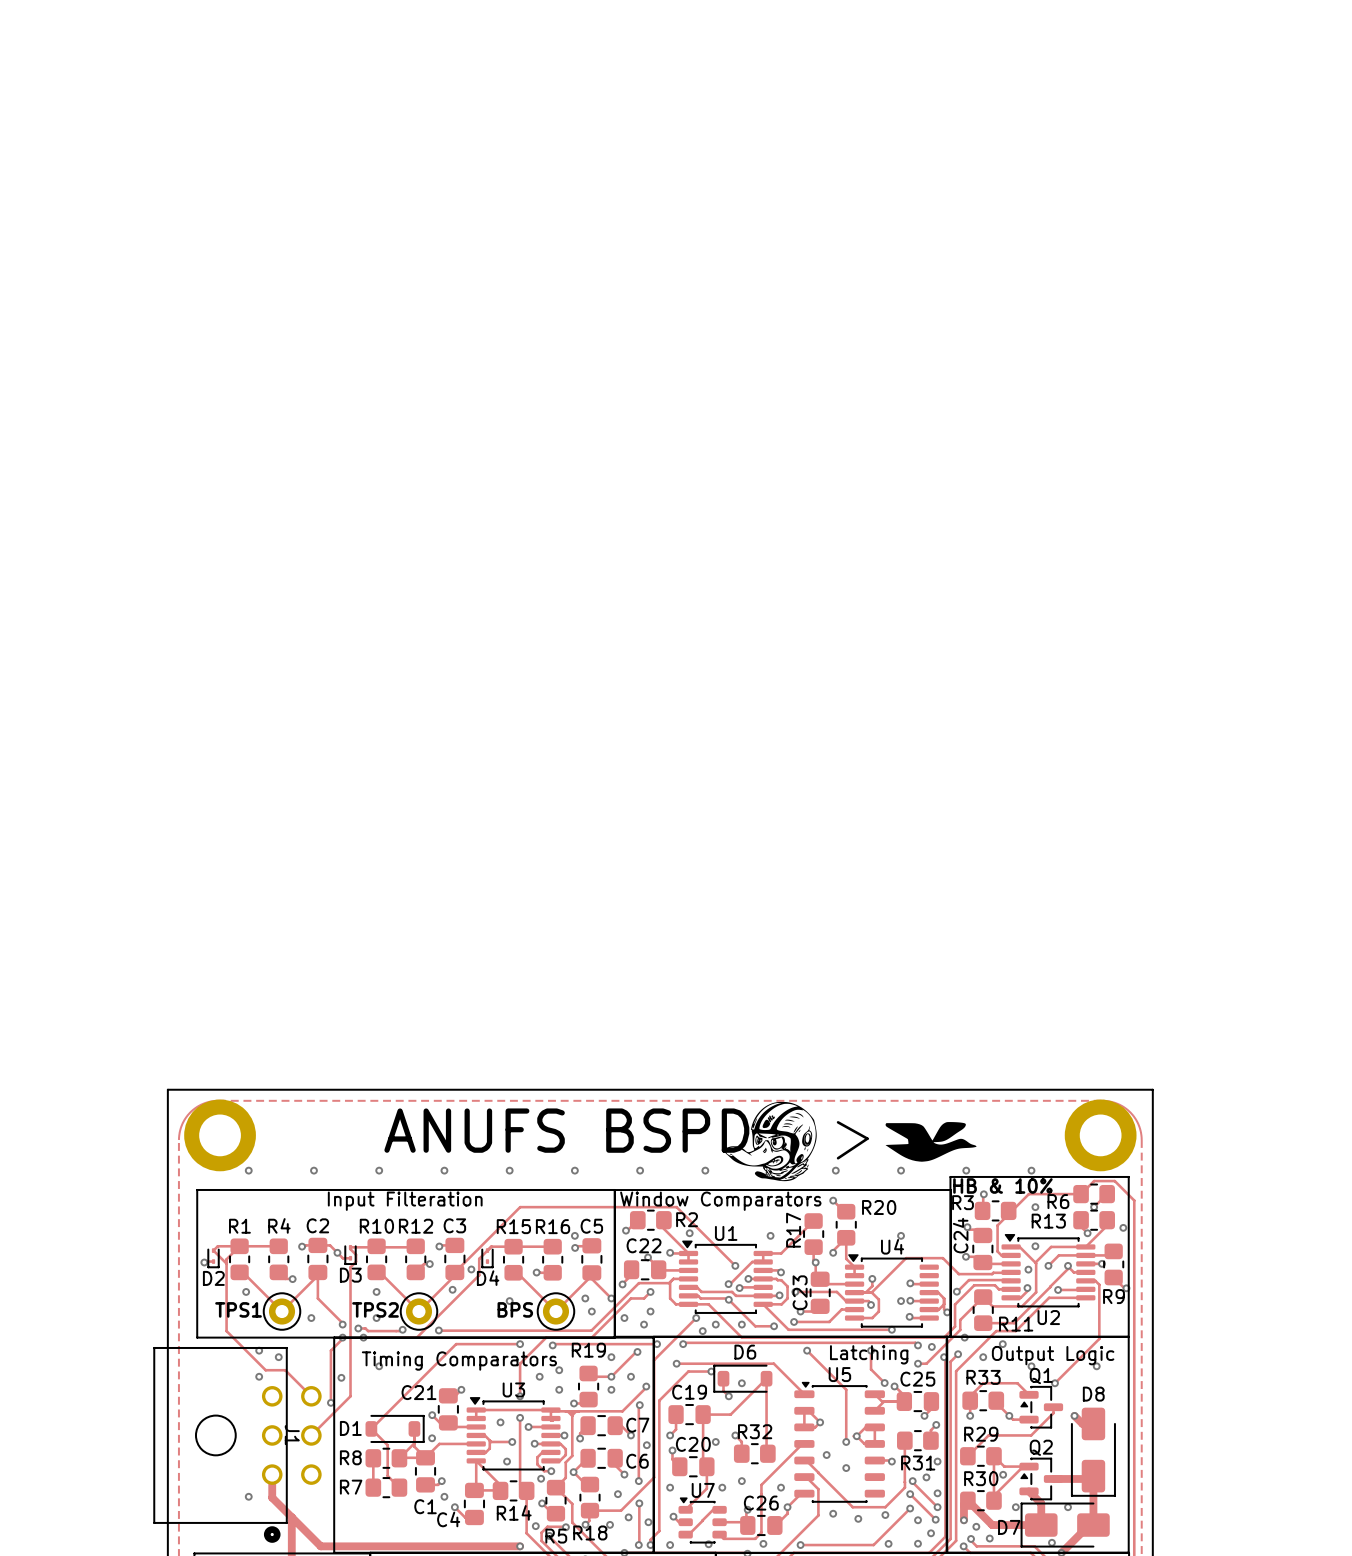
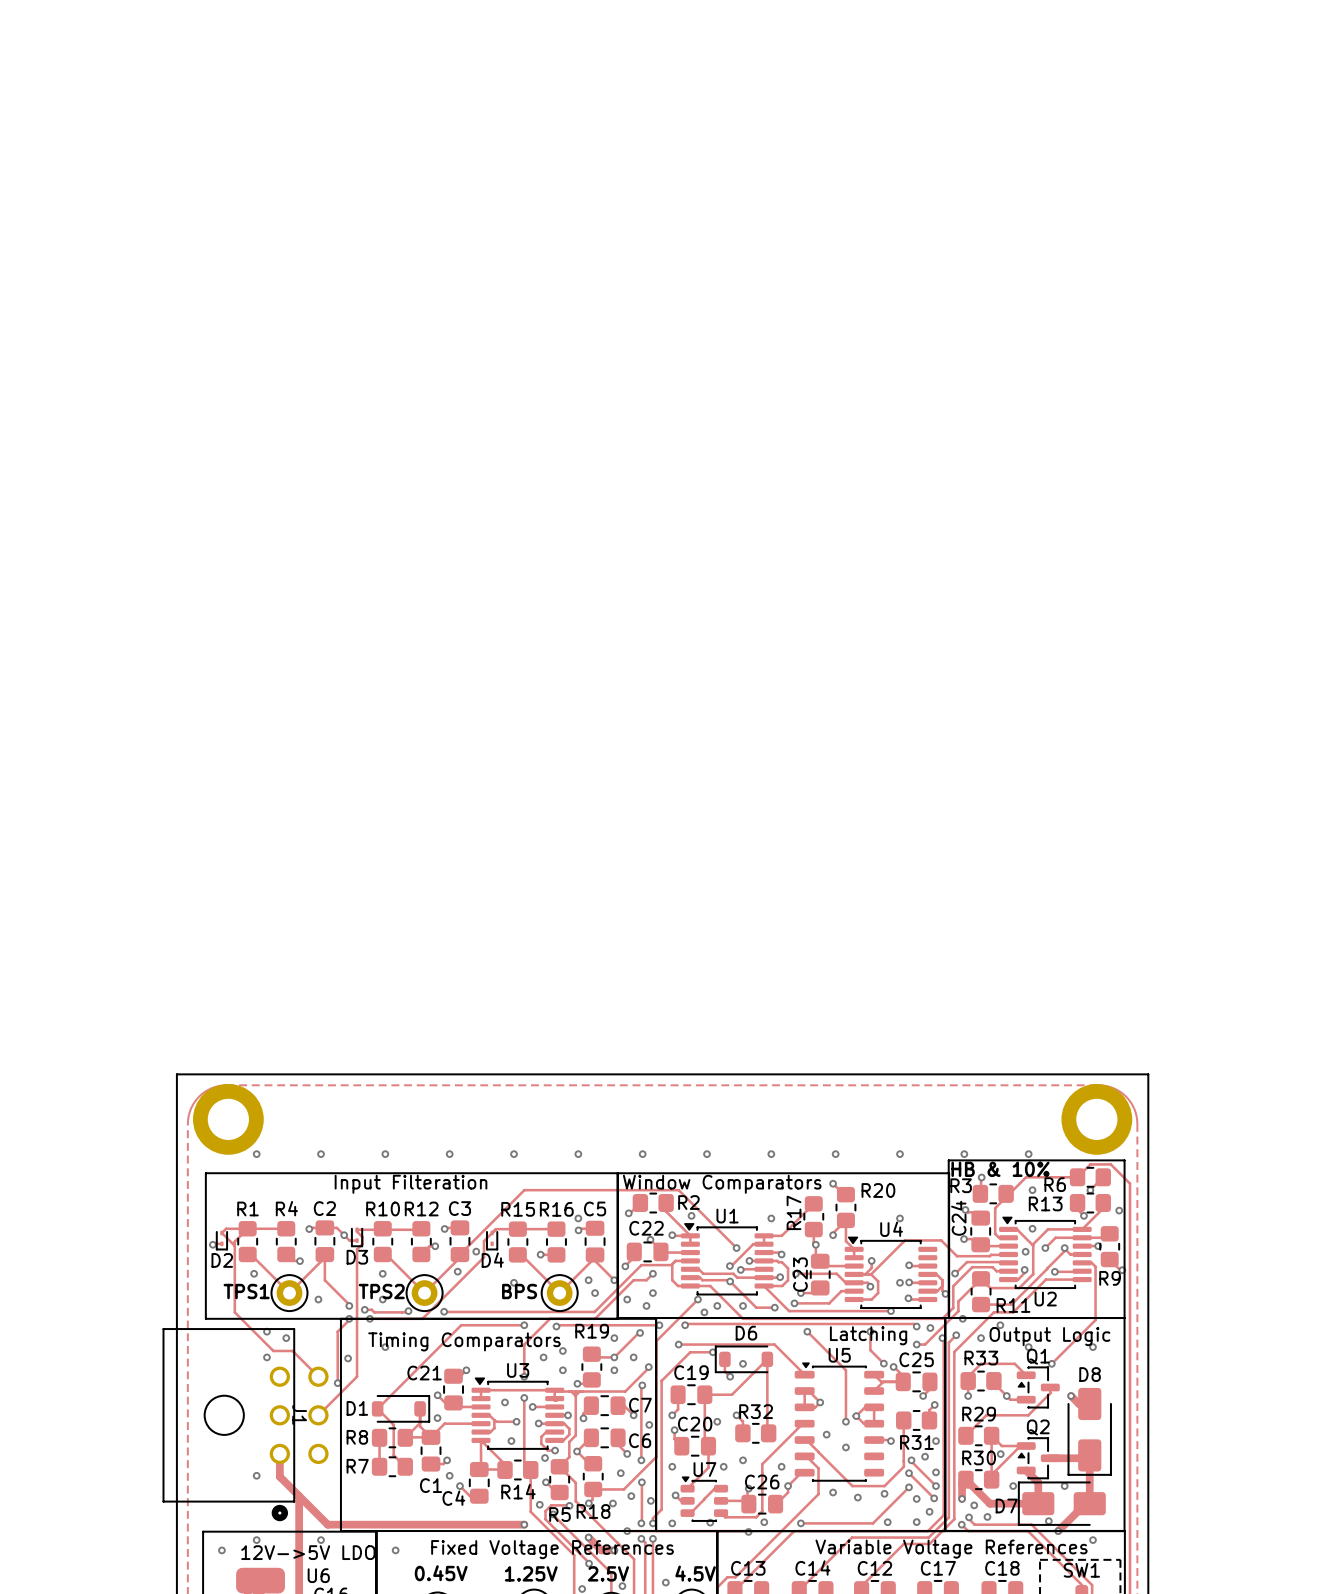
drawing: [725, 1101, 817, 1182] -> none
line: (838, 1122) (867, 1138) (838, 1158) -> none
drawing: [885, 1122, 977, 1162] -> none
text: ANUFS BSPD (566, 1130) -> none
via: none -> (771, 1154)

